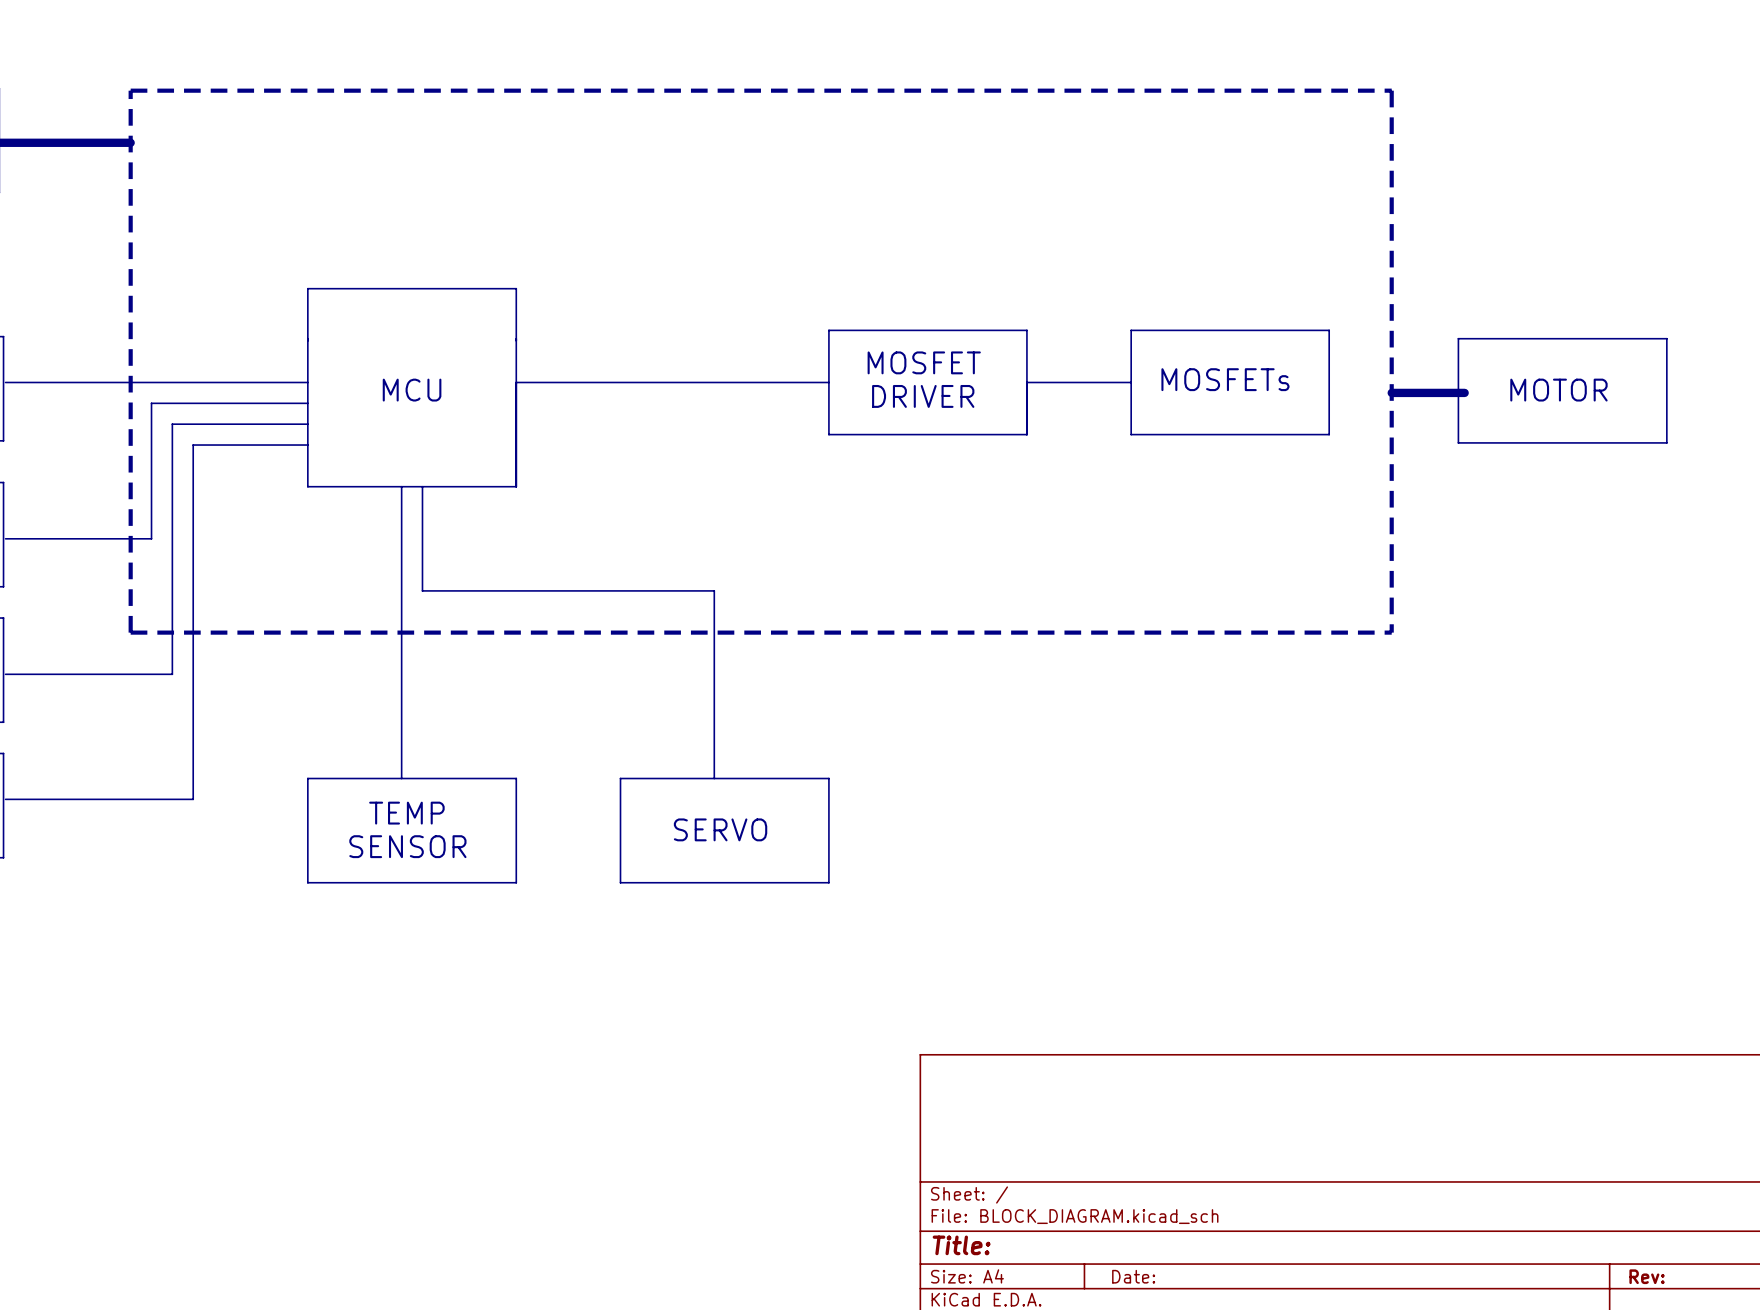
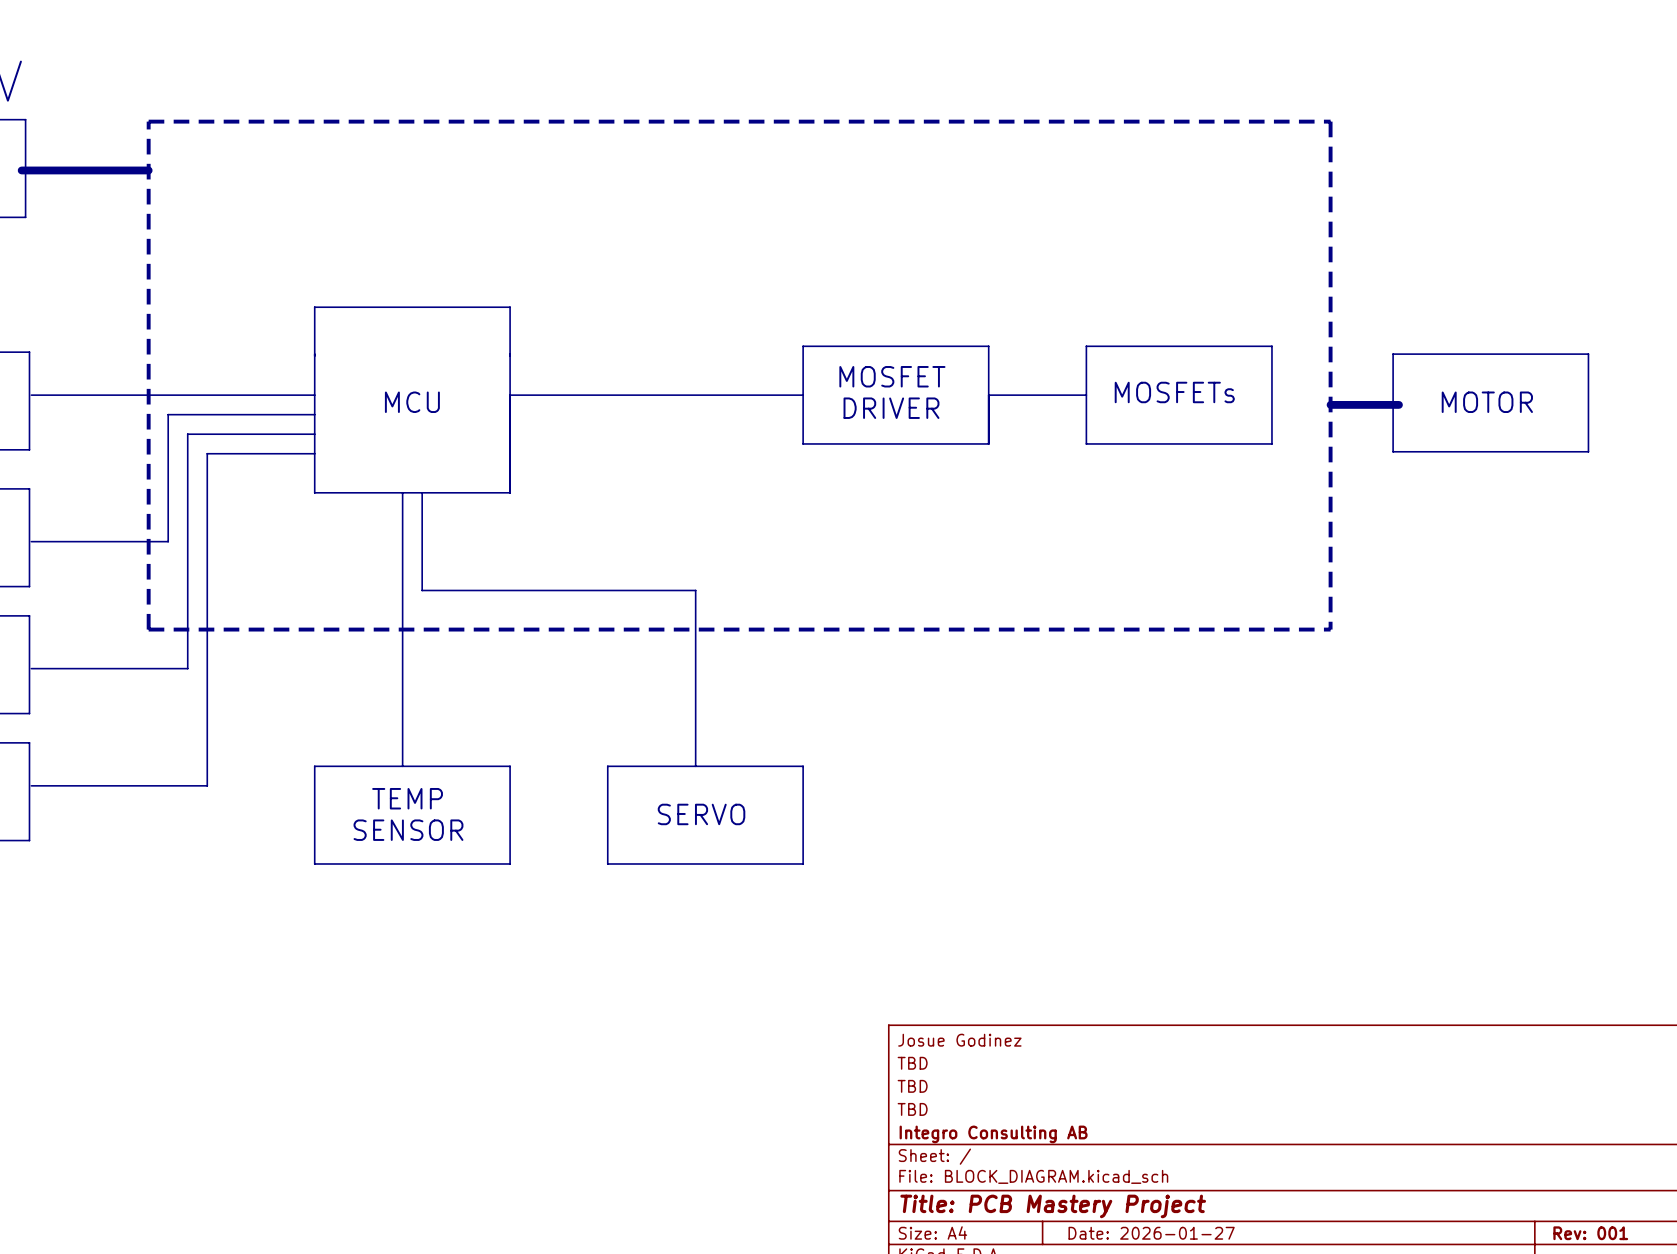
title block: none -> Josue Godinez (959, 1040)
title block: none -> TBD (912, 1063)
title block: none -> TBD (912, 1086)
title block: none -> TBD (912, 1109)
title block: none -> Integro Consulting AB (993, 1134)
title block: Title: (961, 1245) -> Title: PCB Mastery Project (1053, 1206)
title block: Date: (1133, 1276) -> Date: 2026-01-27 (1151, 1233)
title block: Rev: (1647, 1276) -> Rev: 001 (1590, 1233)

